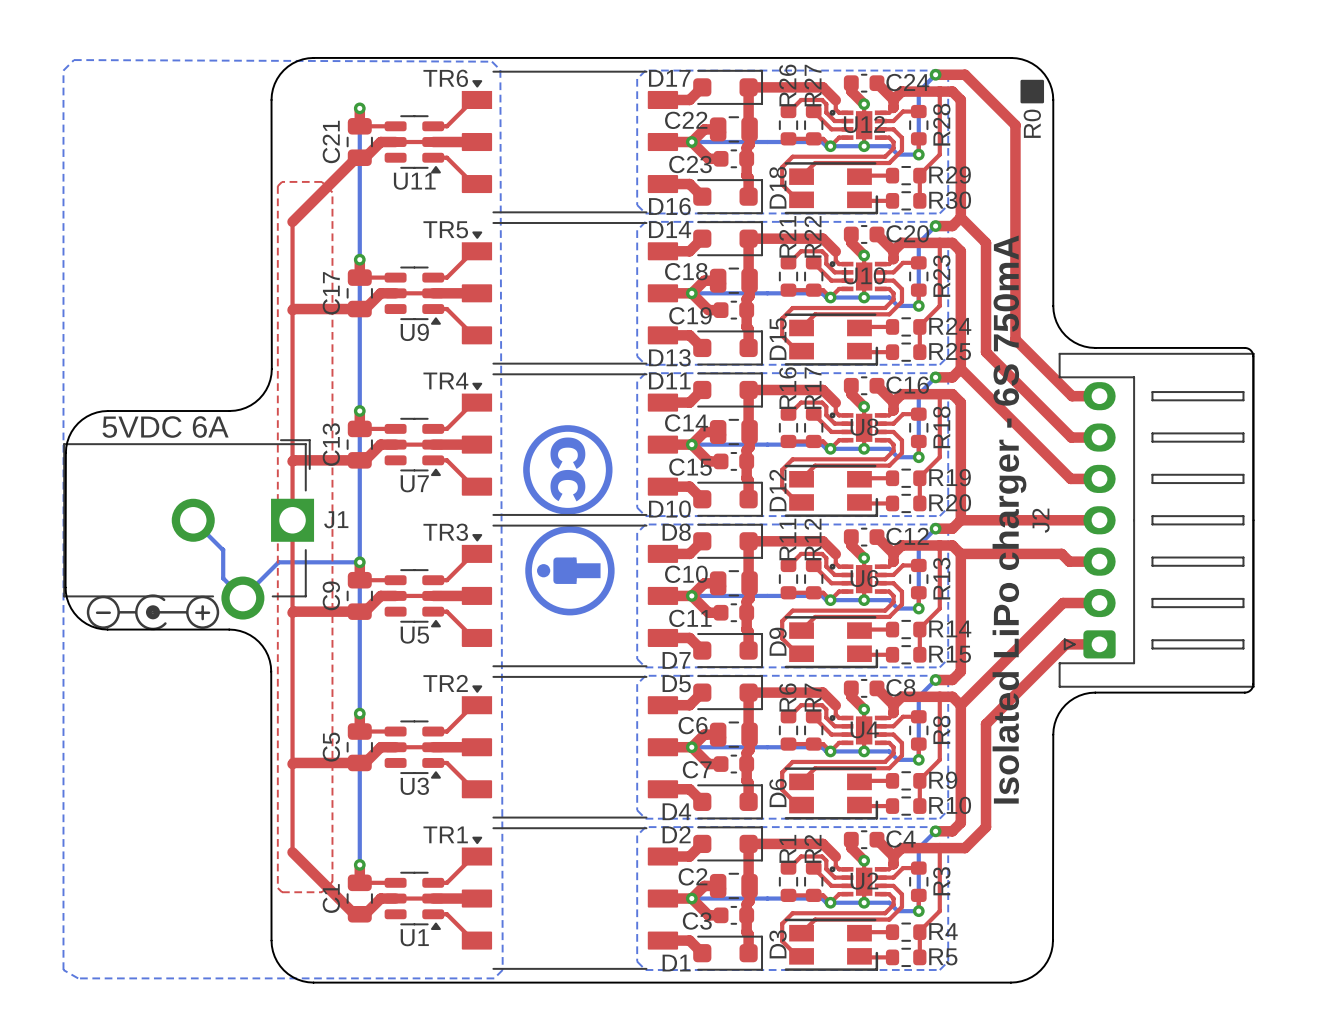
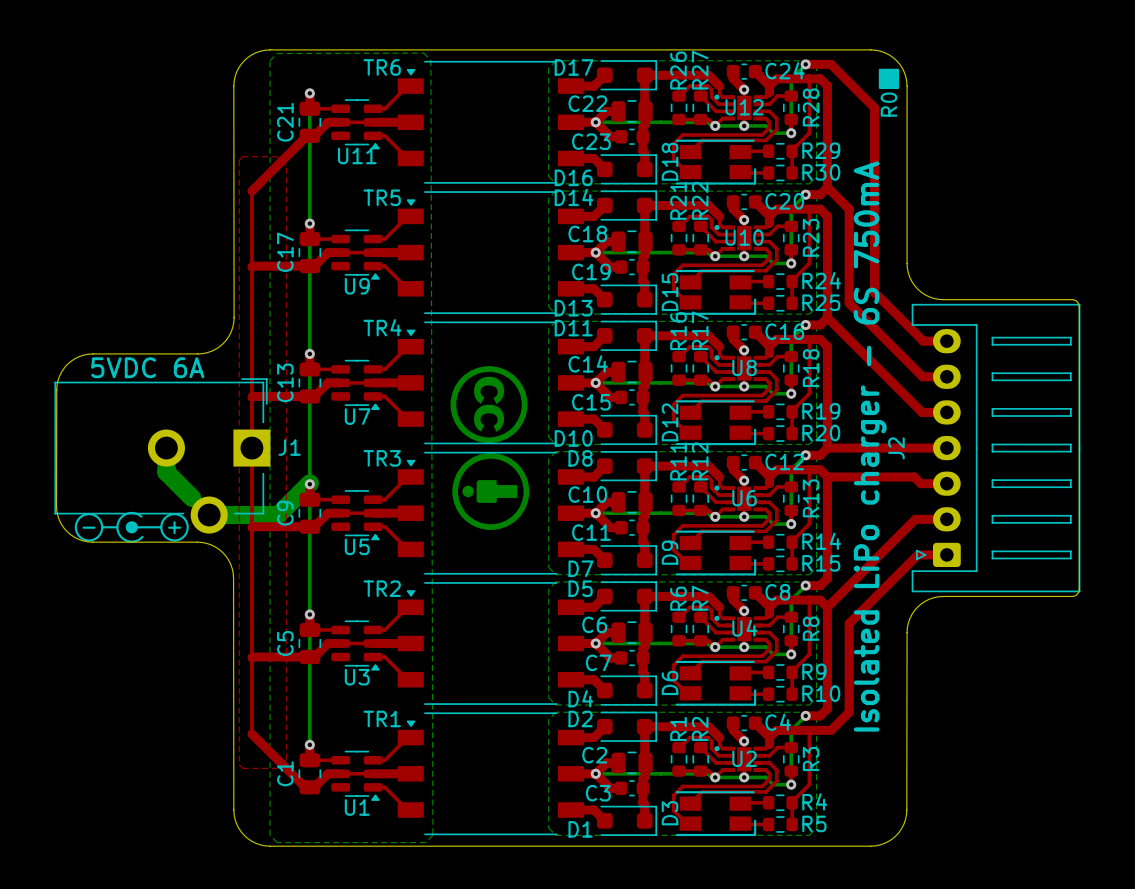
bottom zone outline: (491, 61) (73, 60) (63, 70) (63, 969) (78, 978) (321, 978) -> (423, 53) (277, 53) (270, 60) (270, 835) (277, 842)
bottom track: (193, 520) (223, 549) (223, 578) -> (166, 448) (166, 472) (192, 498)
bottom track: (359, 562) (278, 562) (242, 598) -> (309, 483) (278, 515) (209, 515)

